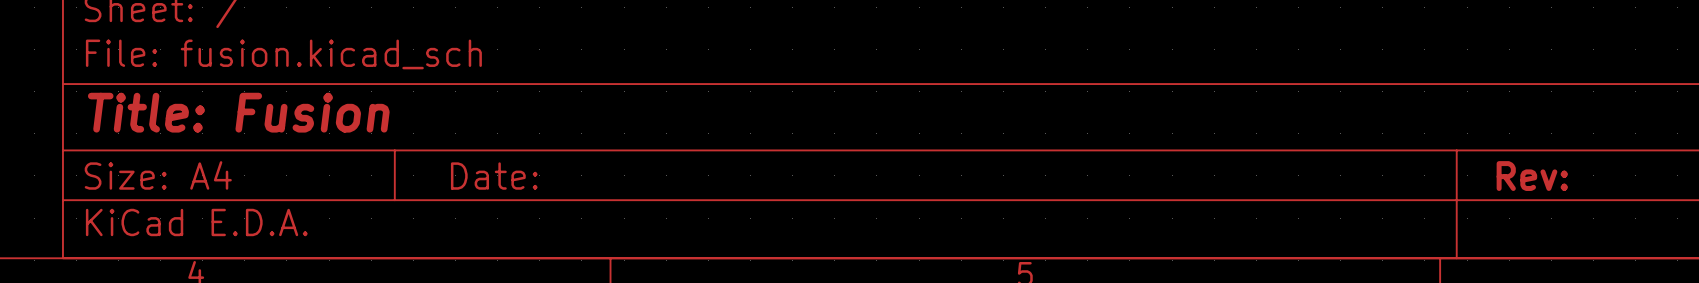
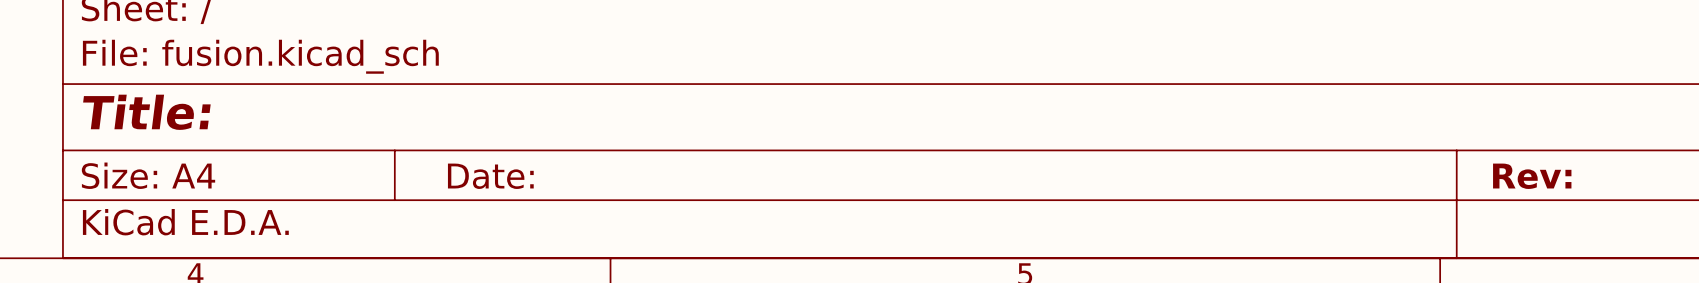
title block: Title: Fusion (238, 112) -> Title: (146, 112)

